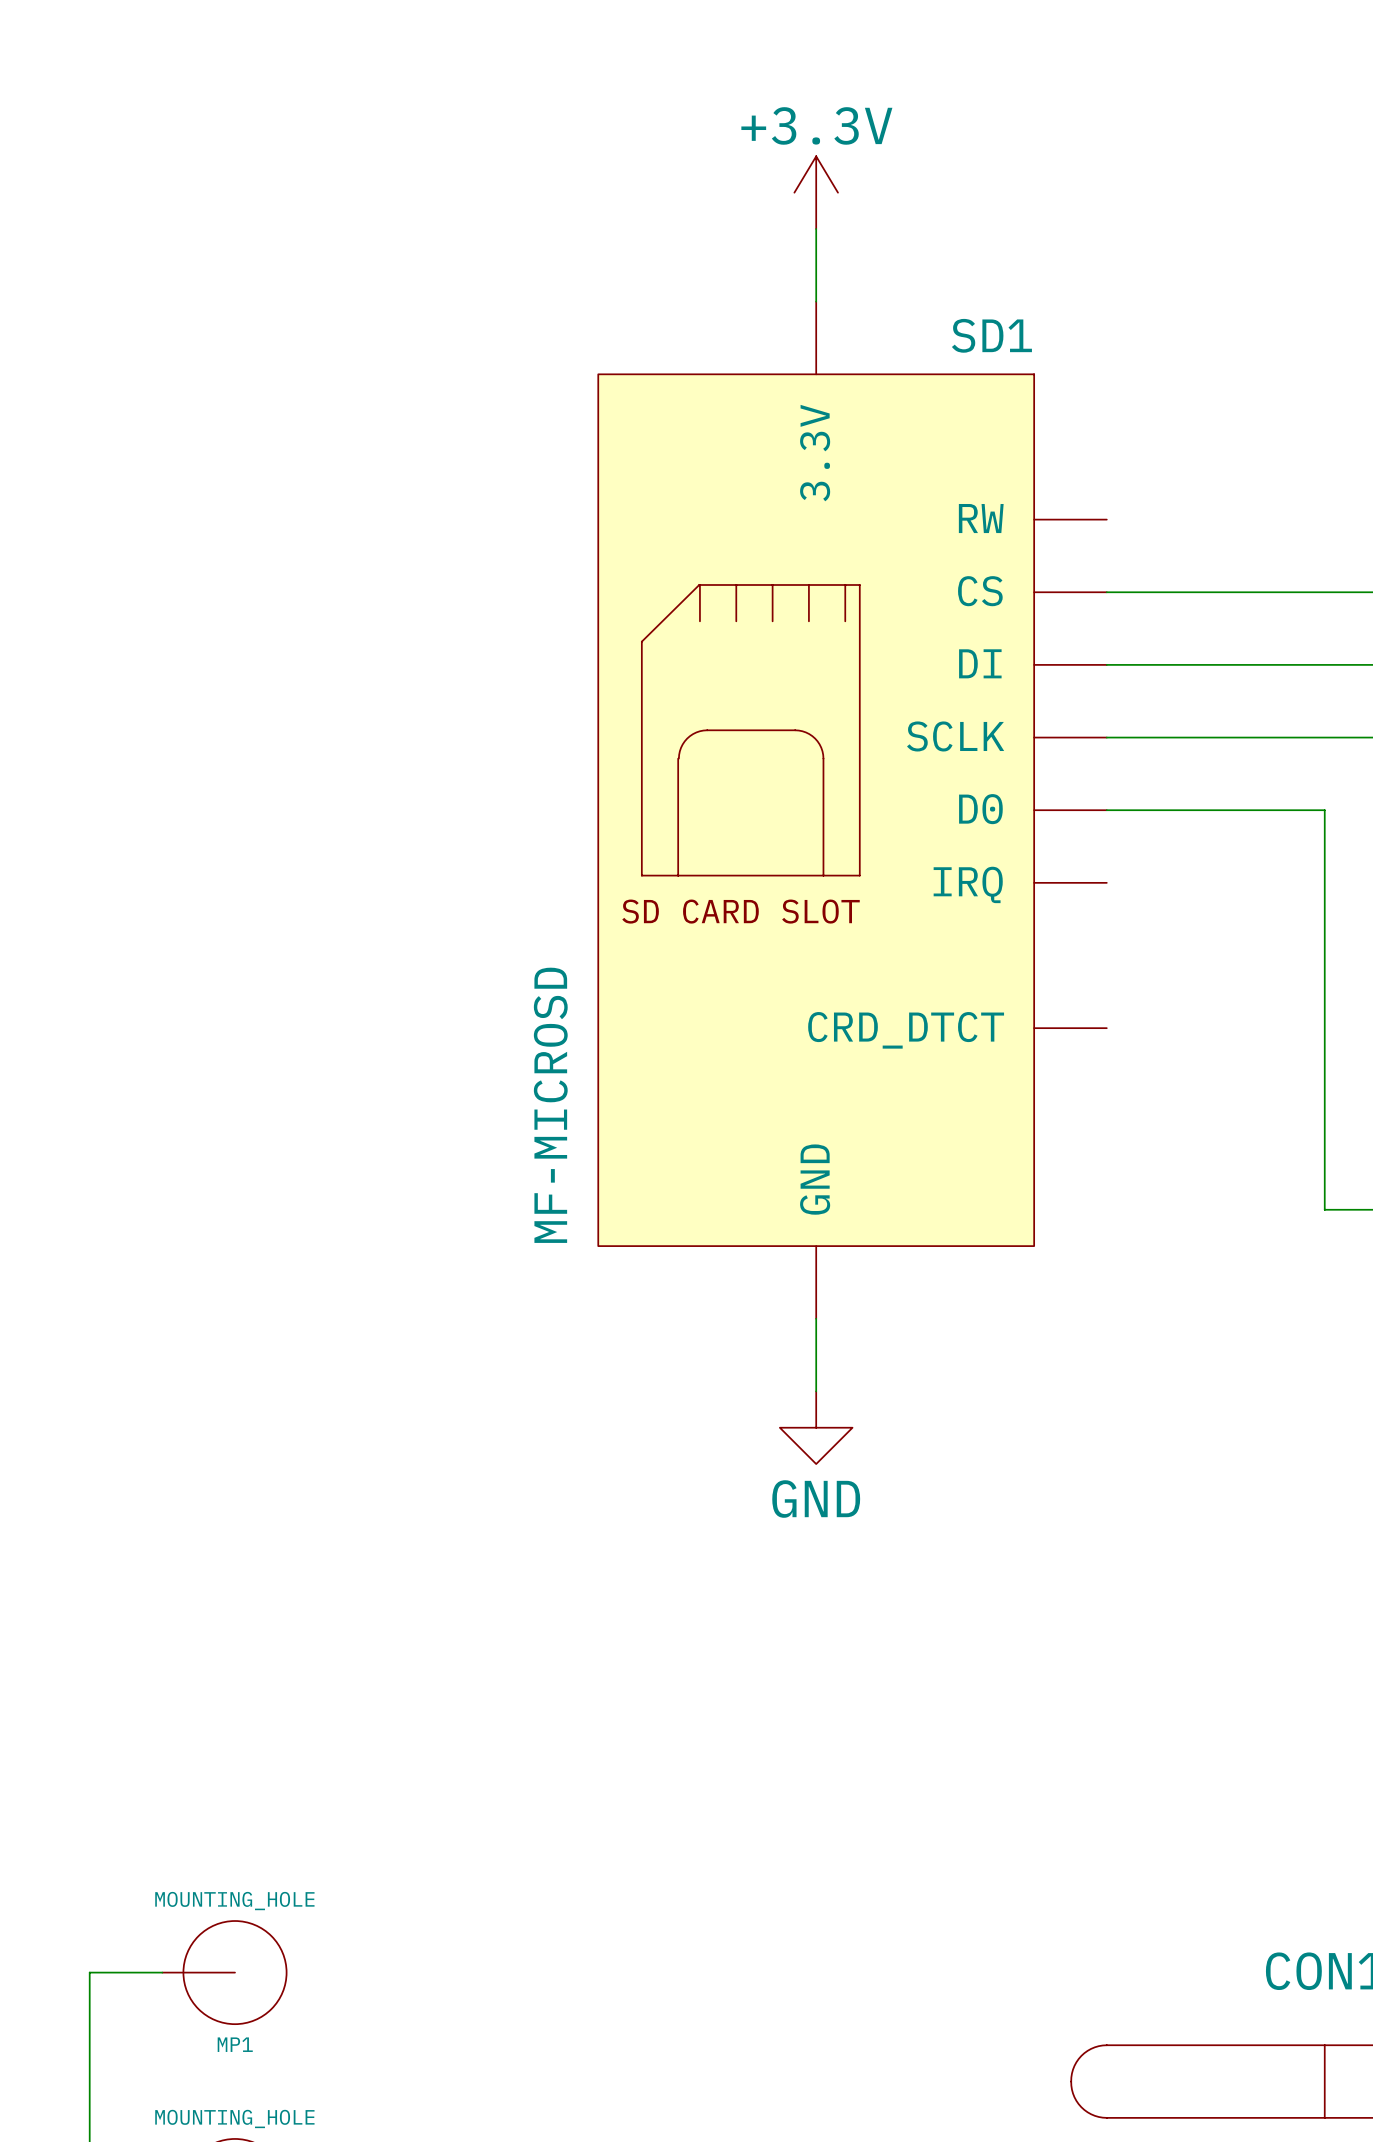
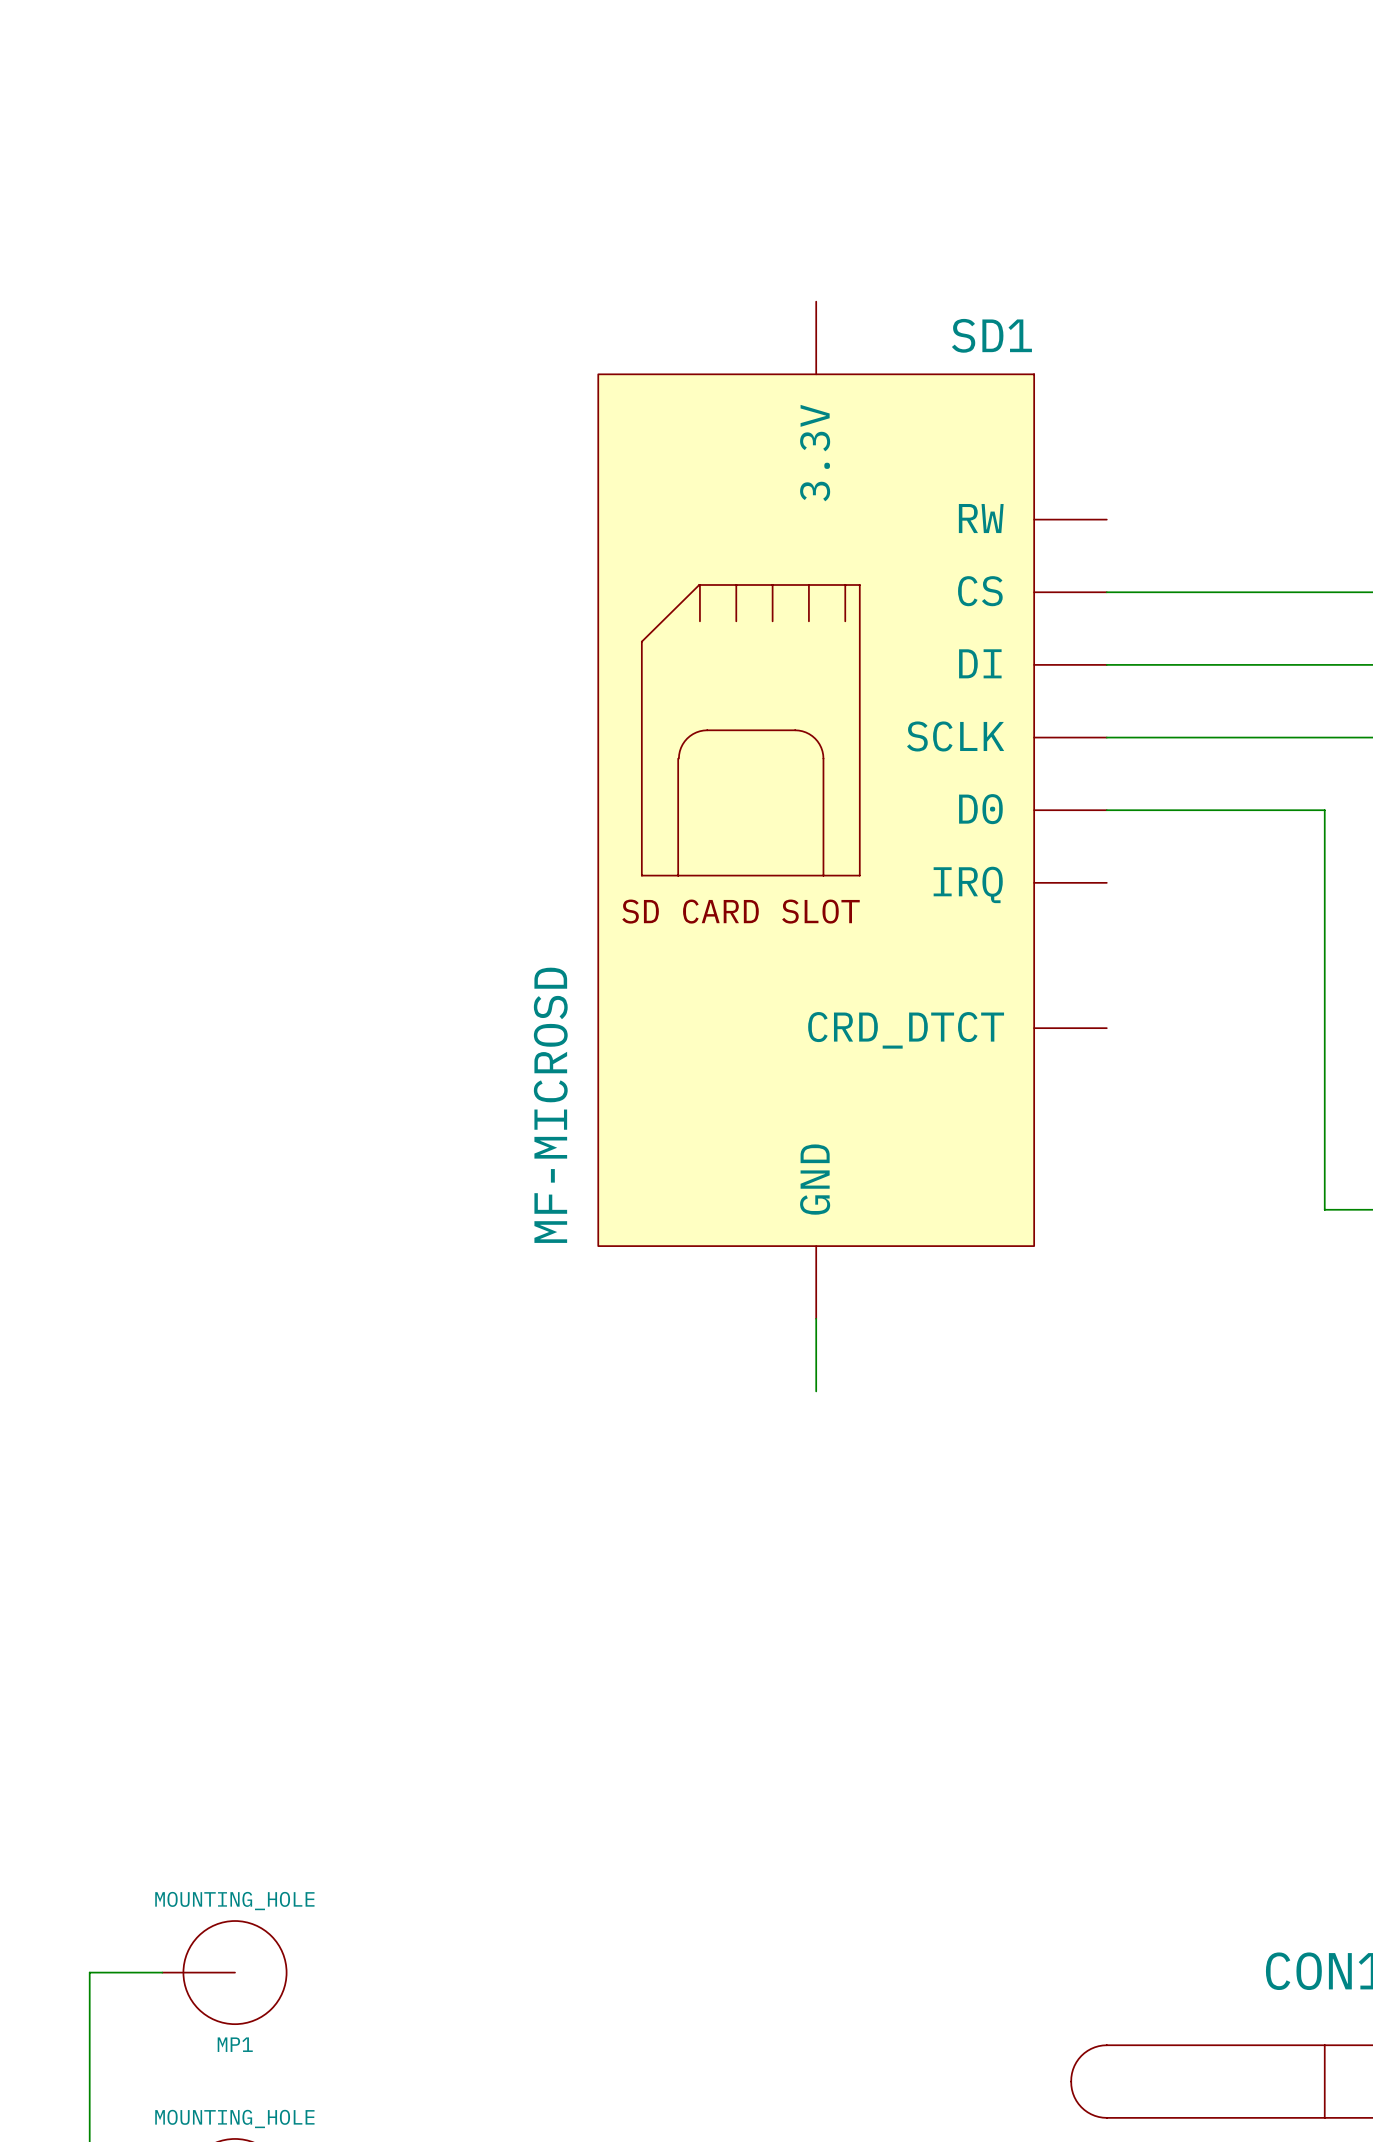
power symbol: +3.3V (816, 192) -> none
wire: (816, 229) (816, 301) -> none
power symbol: GND (816, 1427) -> none

